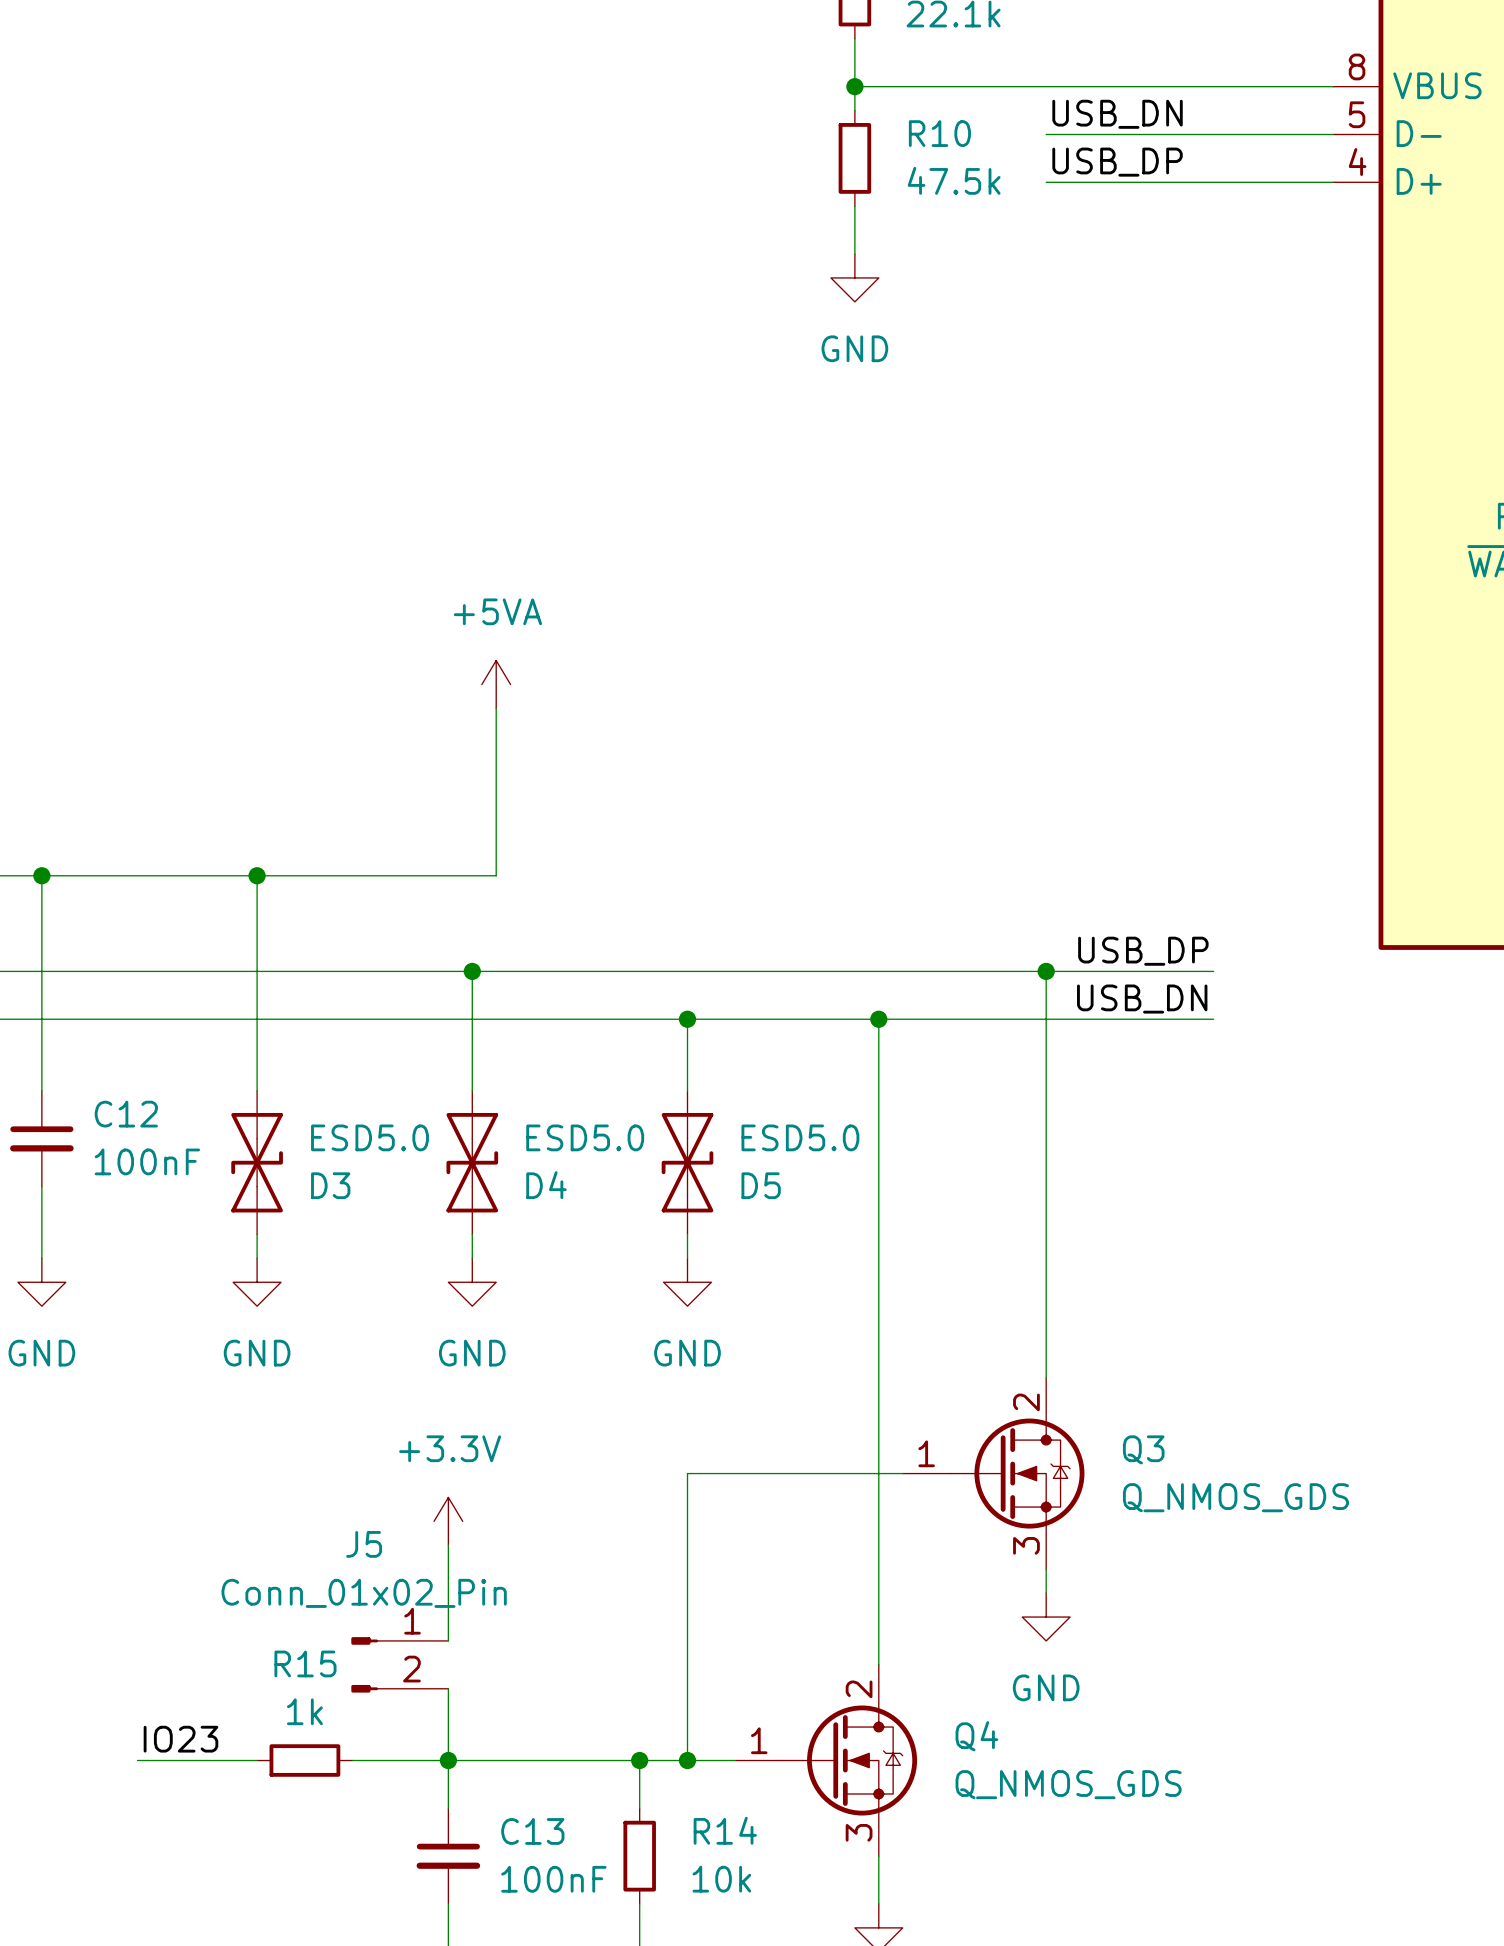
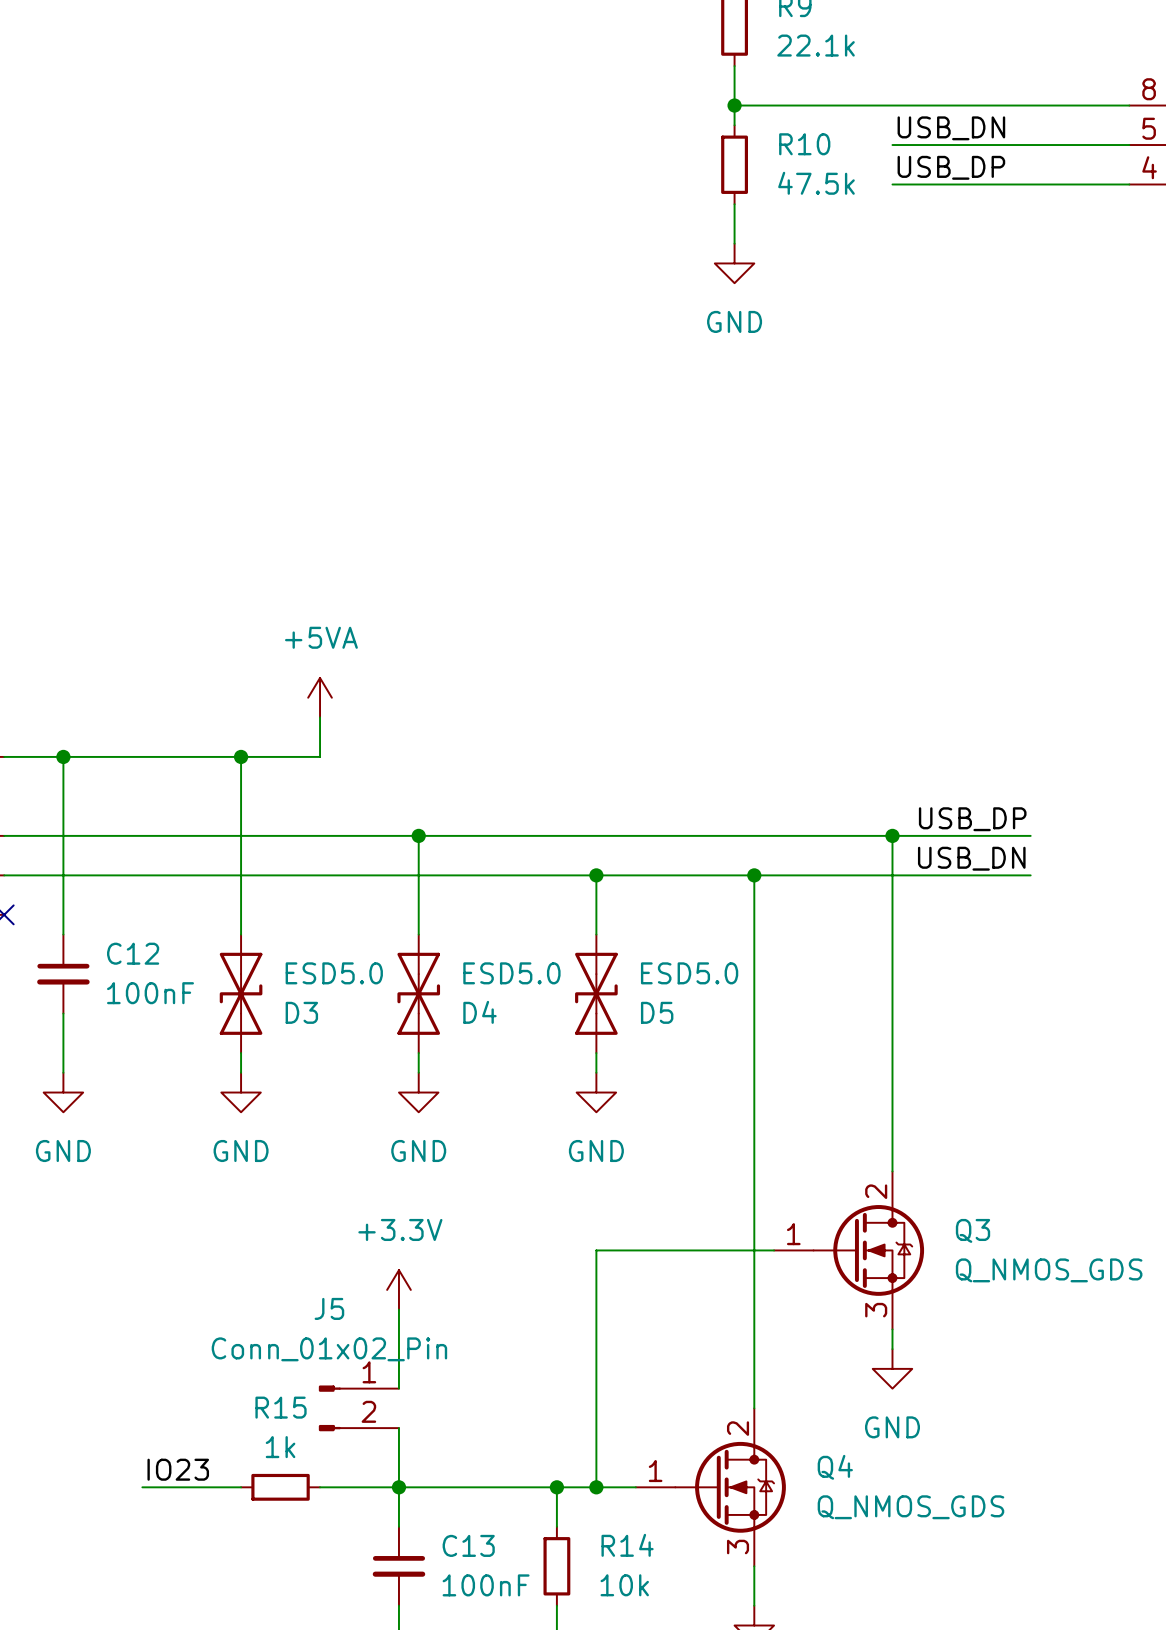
power symbol position: +5VA (496, 684) -> +5VA (320, 697)
wire: (496, 708) (496, 875) (352, 875) -> (320, 717) (320, 756)

